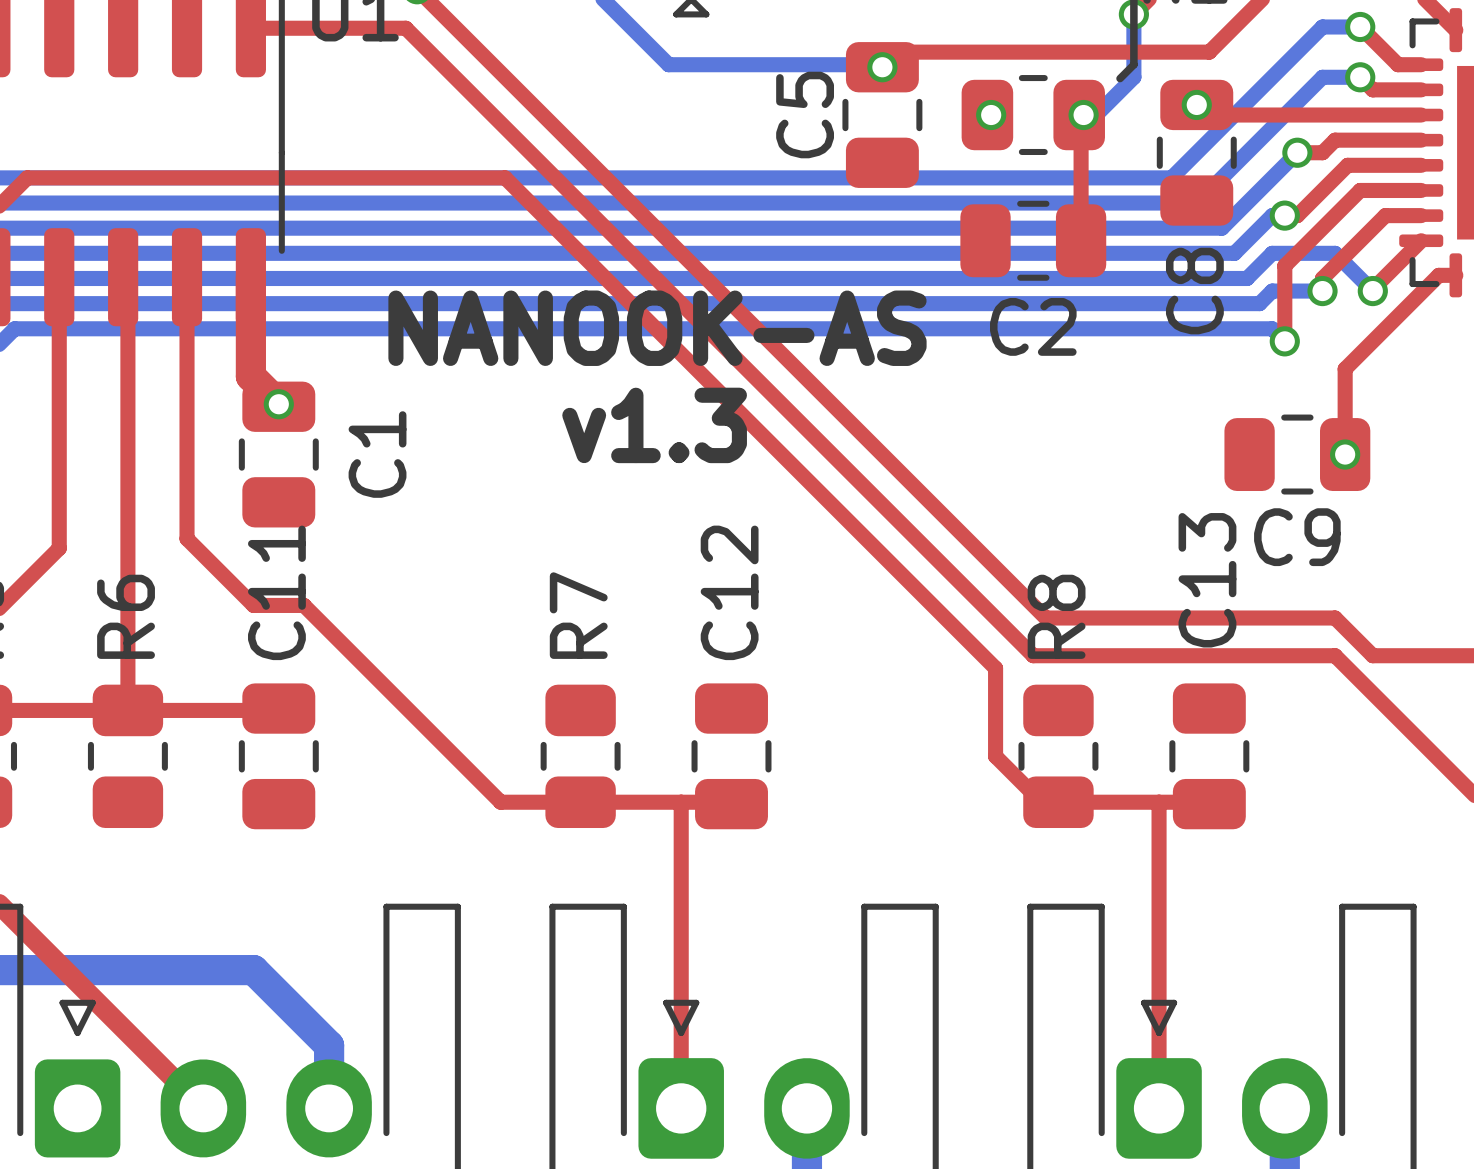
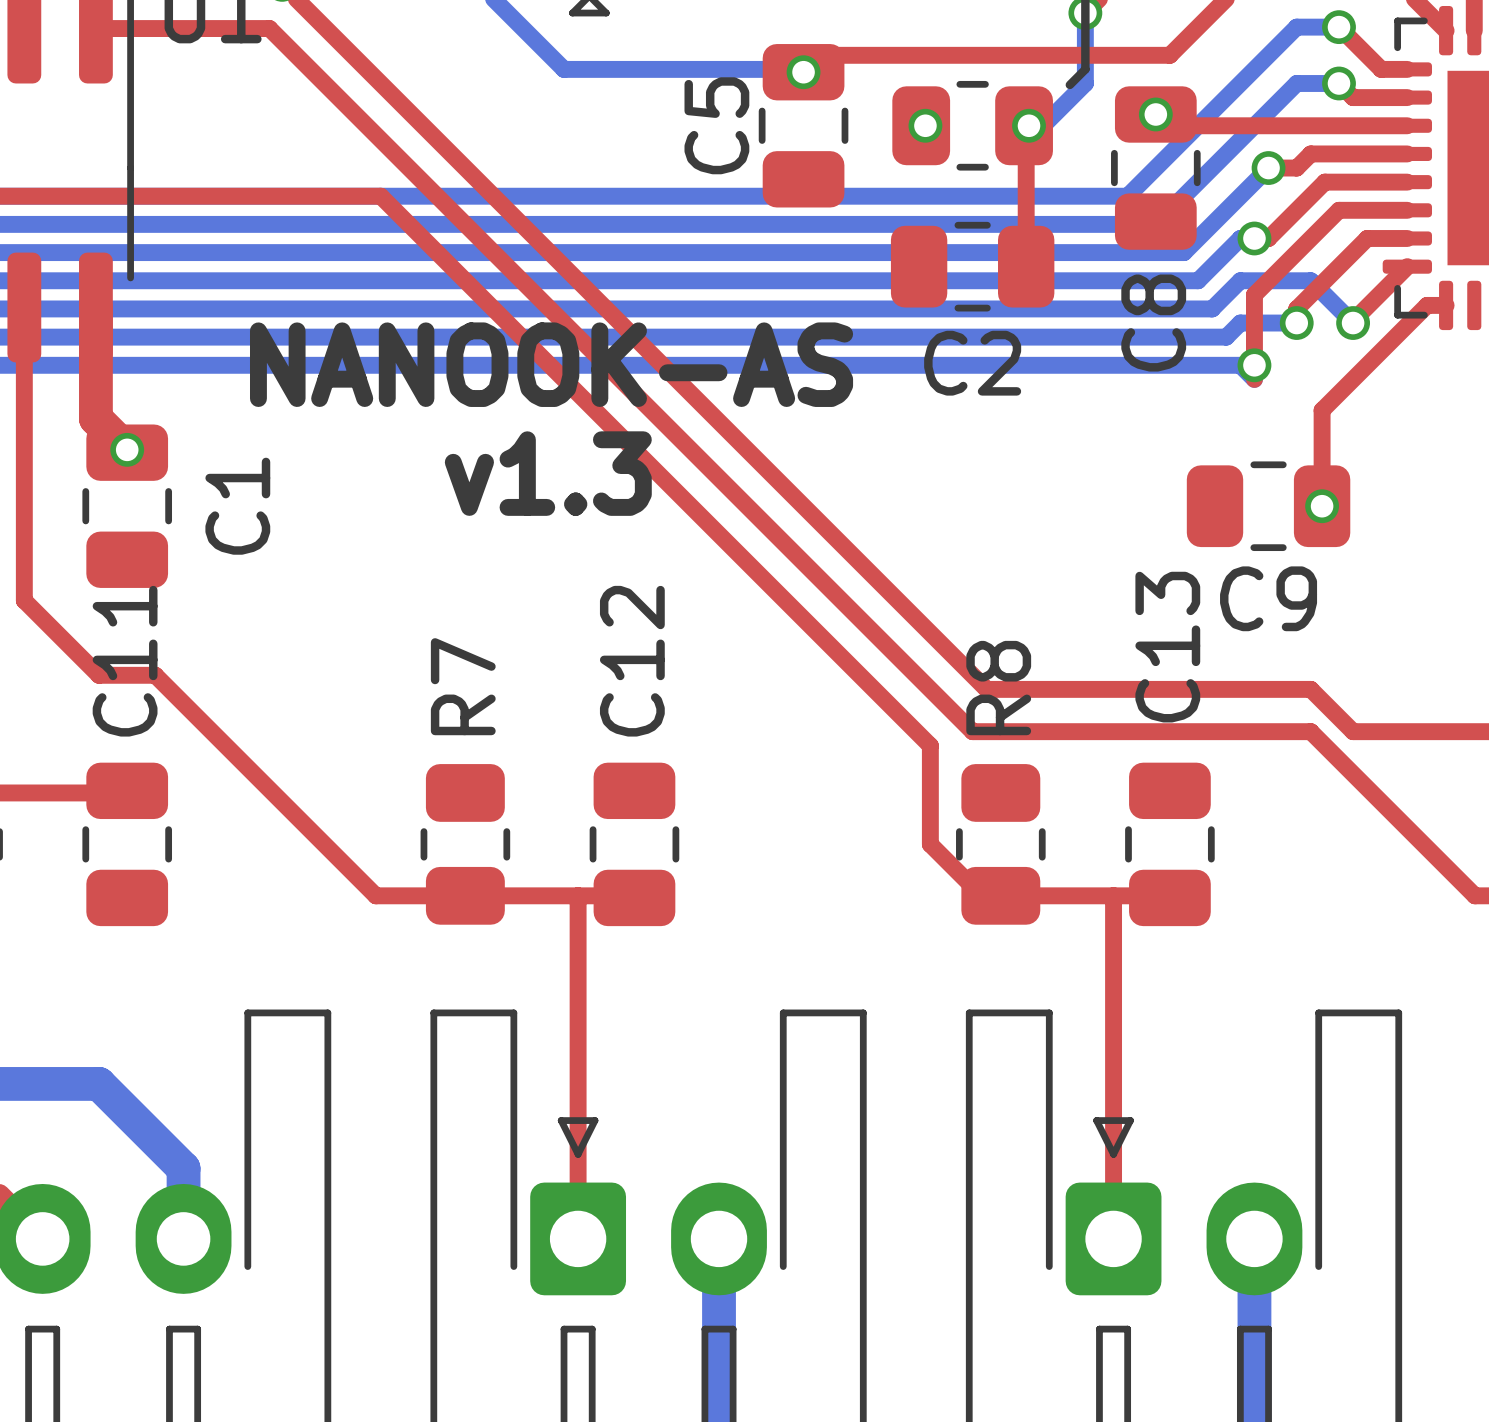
via position: (1284, 341) -> (1254, 365)

